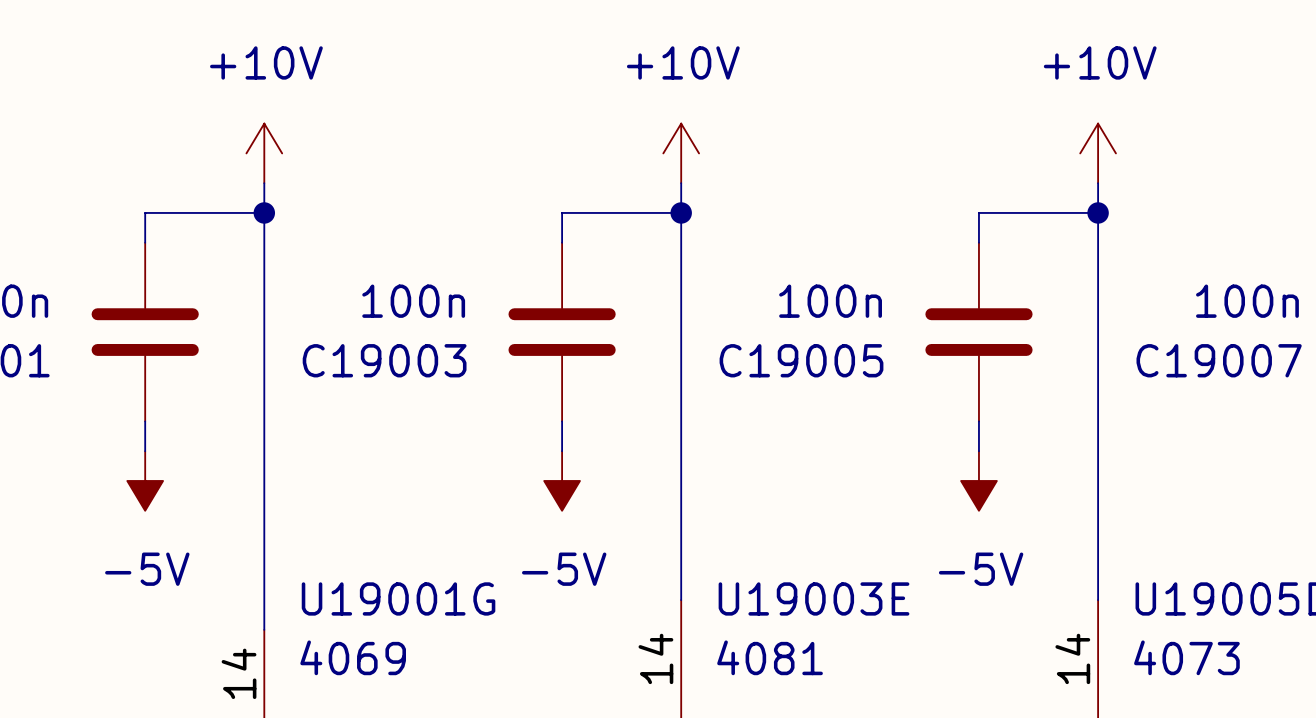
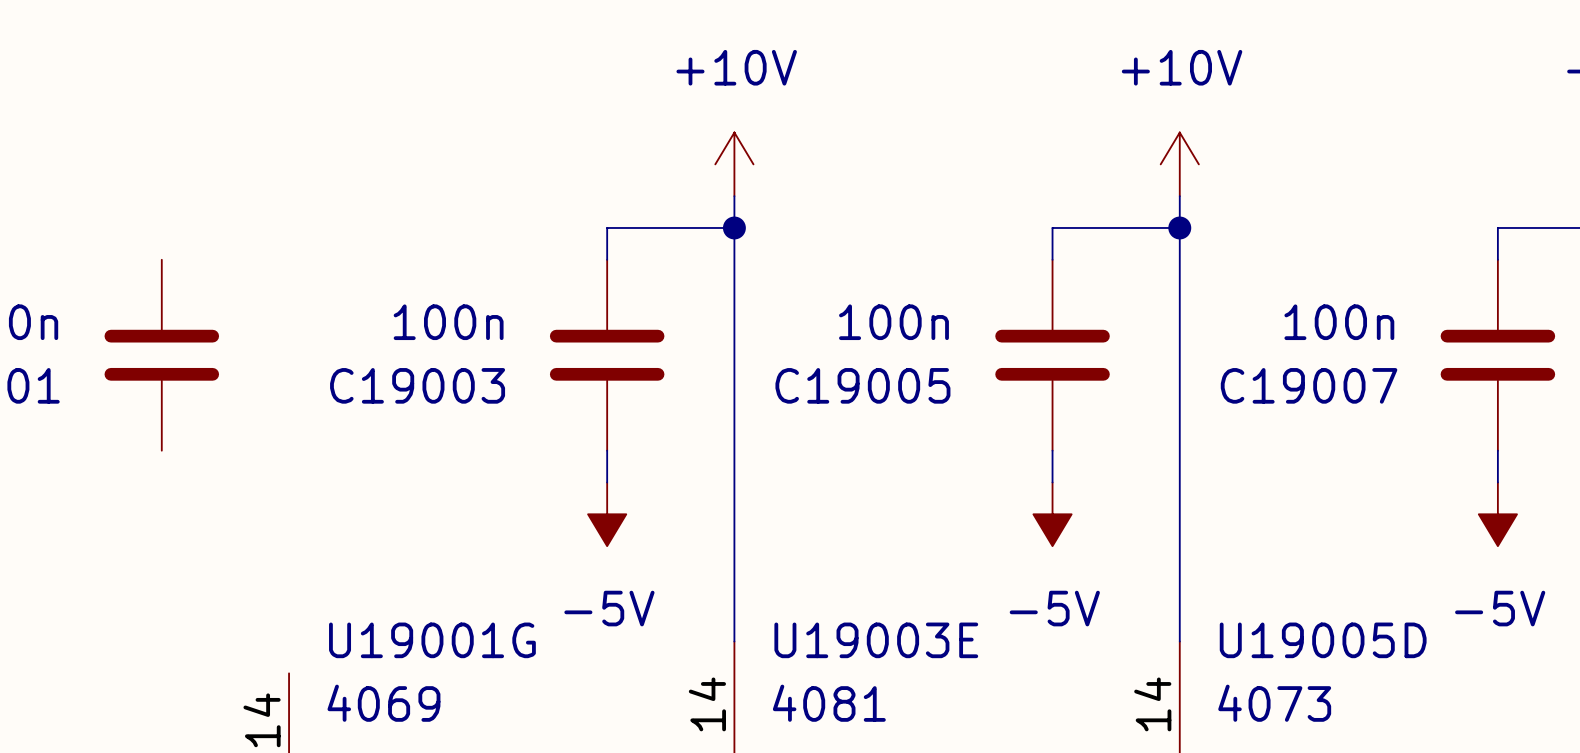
power symbol: +10V (264, 153) -> none
wire: (264, 183) (264, 629) -> none
wire: (264, 212) (145, 212) (145, 242) -> none
junction: (264, 212) -> none
wire: (145, 421) (145, 451) -> none
power symbol: -5V (145, 480) -> none

